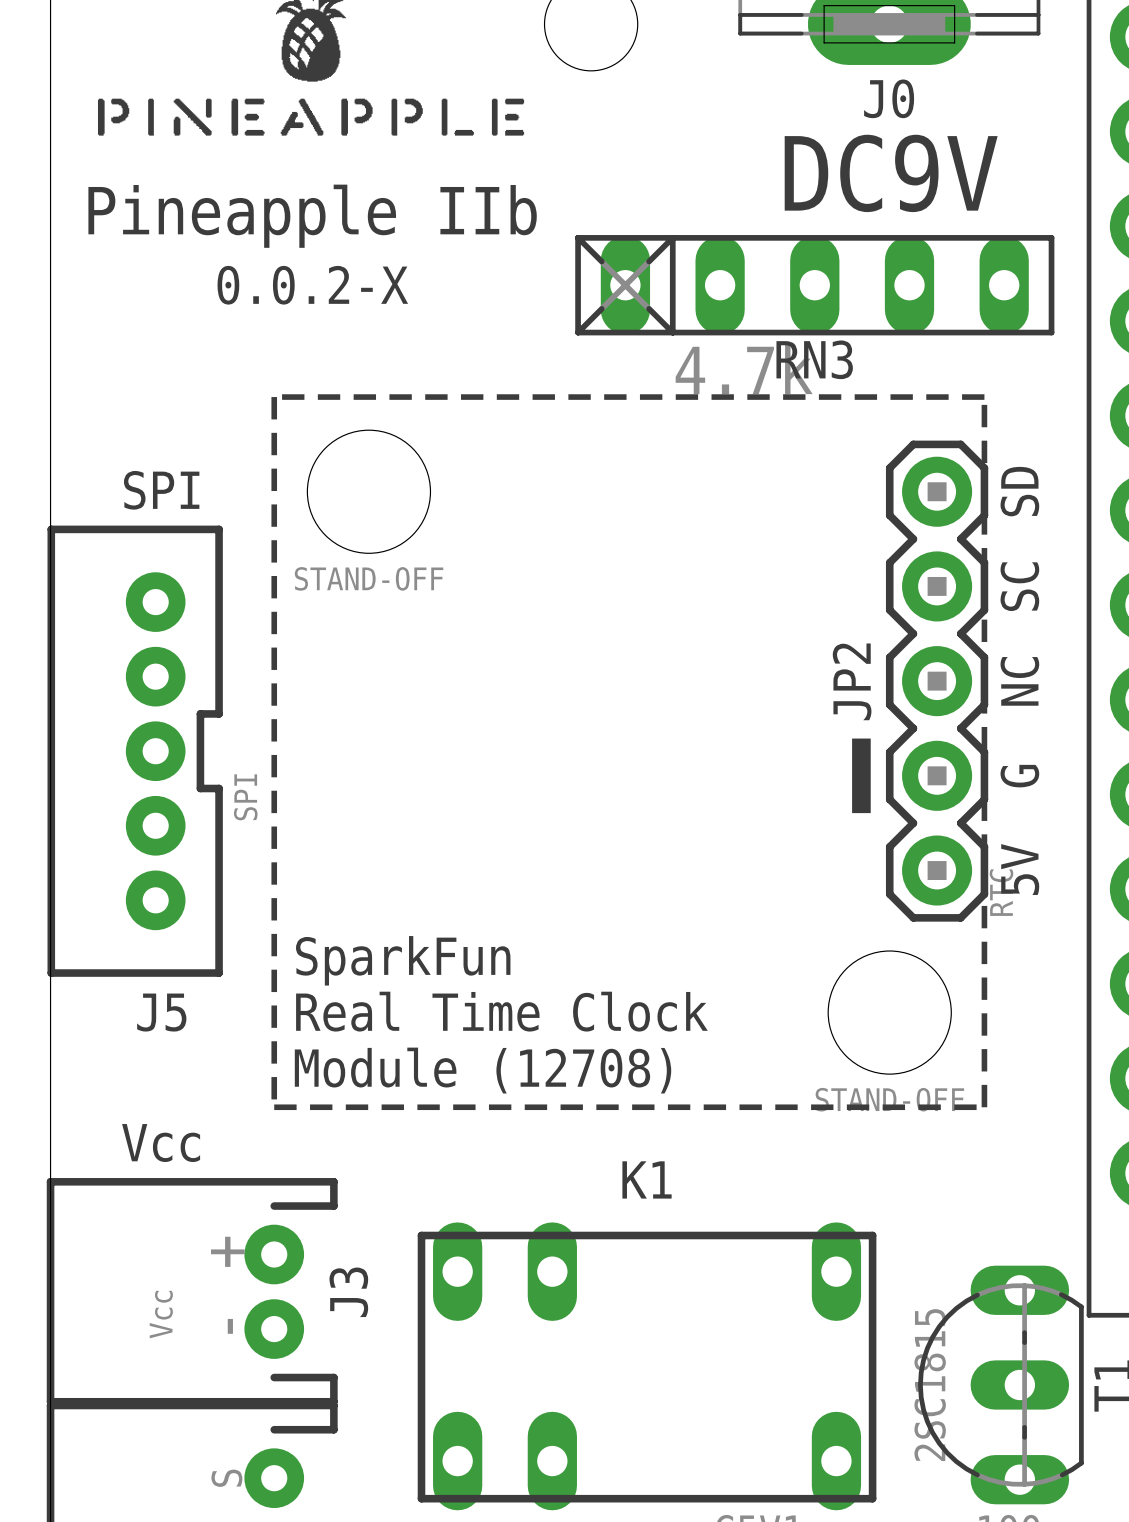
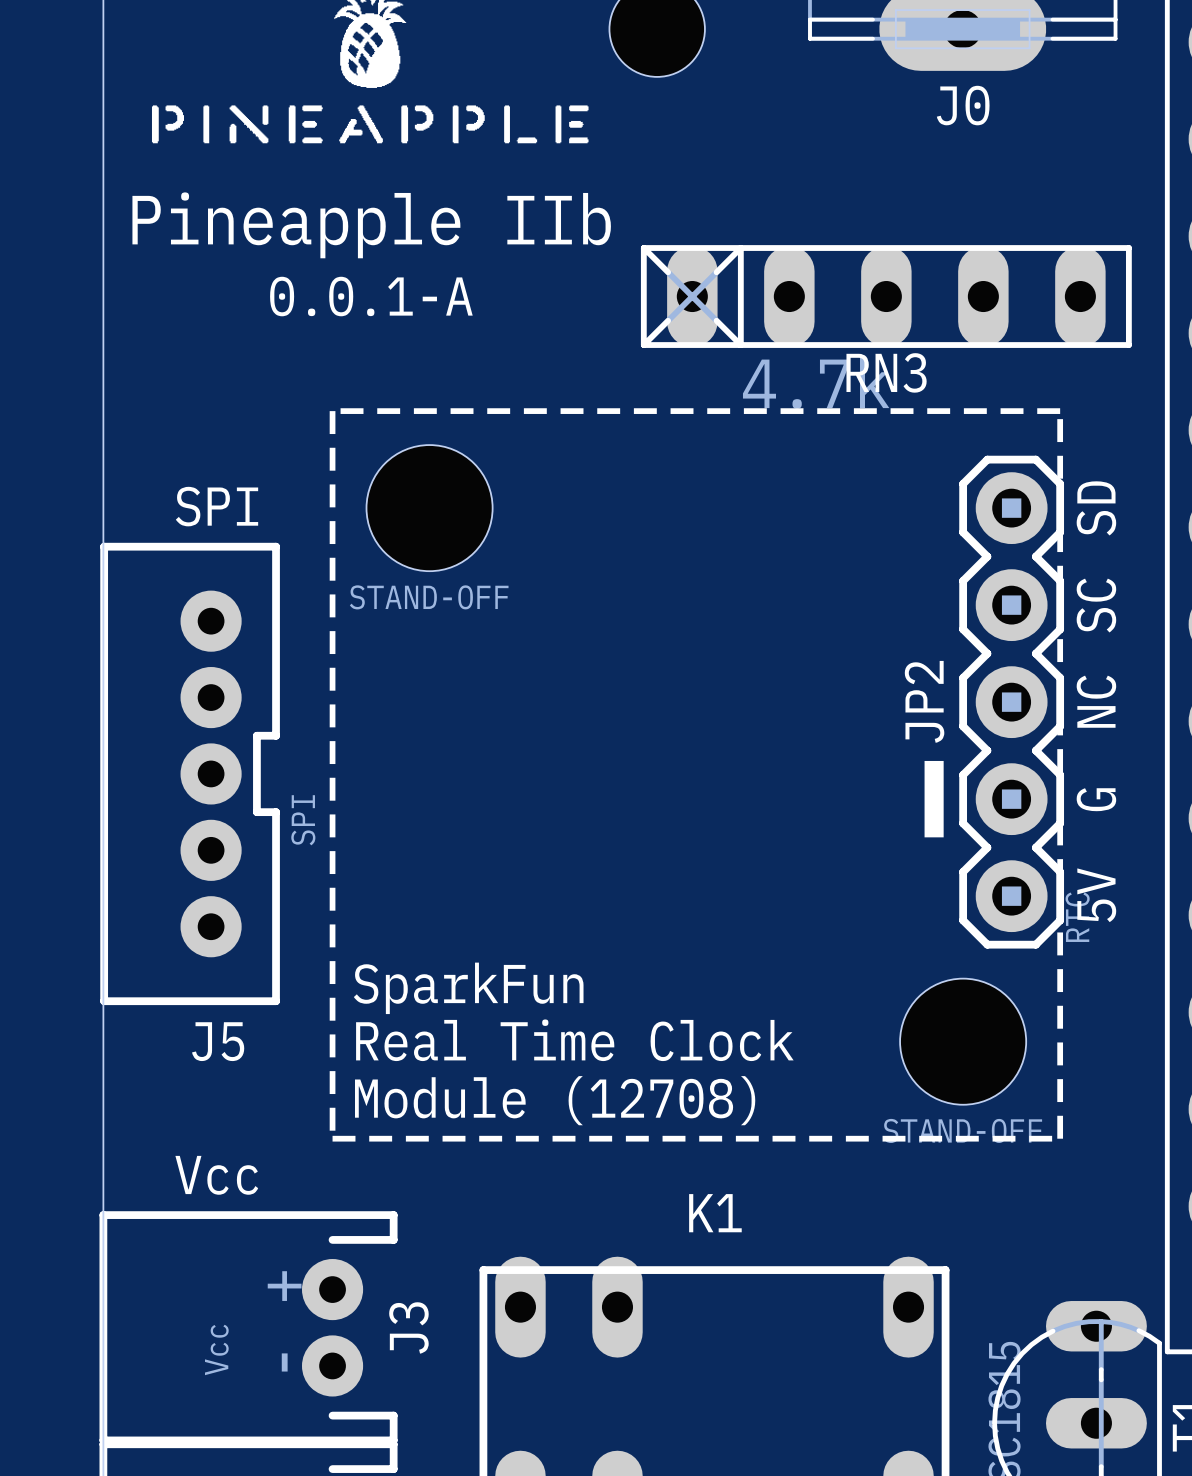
text: DC9V (891, 173) -> none
text: 0.0.2-X (312, 285) -> 0.0.1-A (371, 296)

